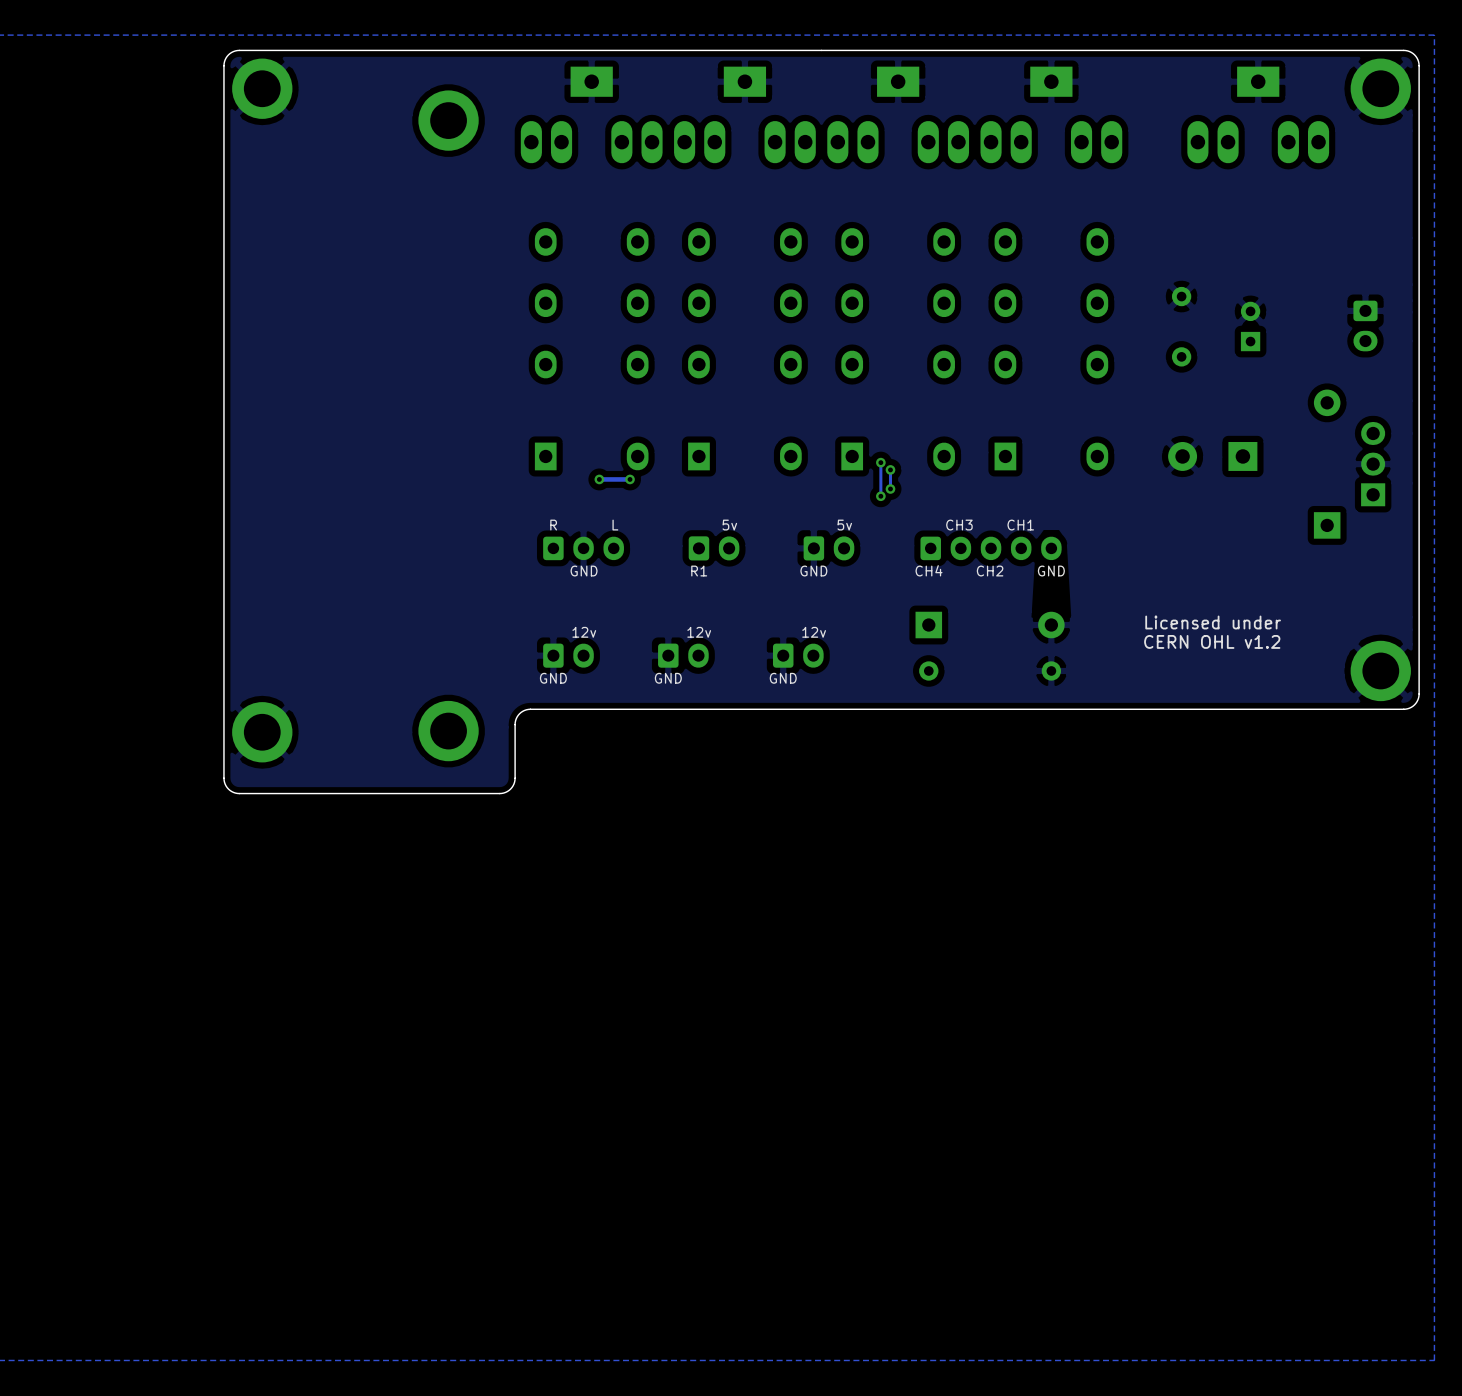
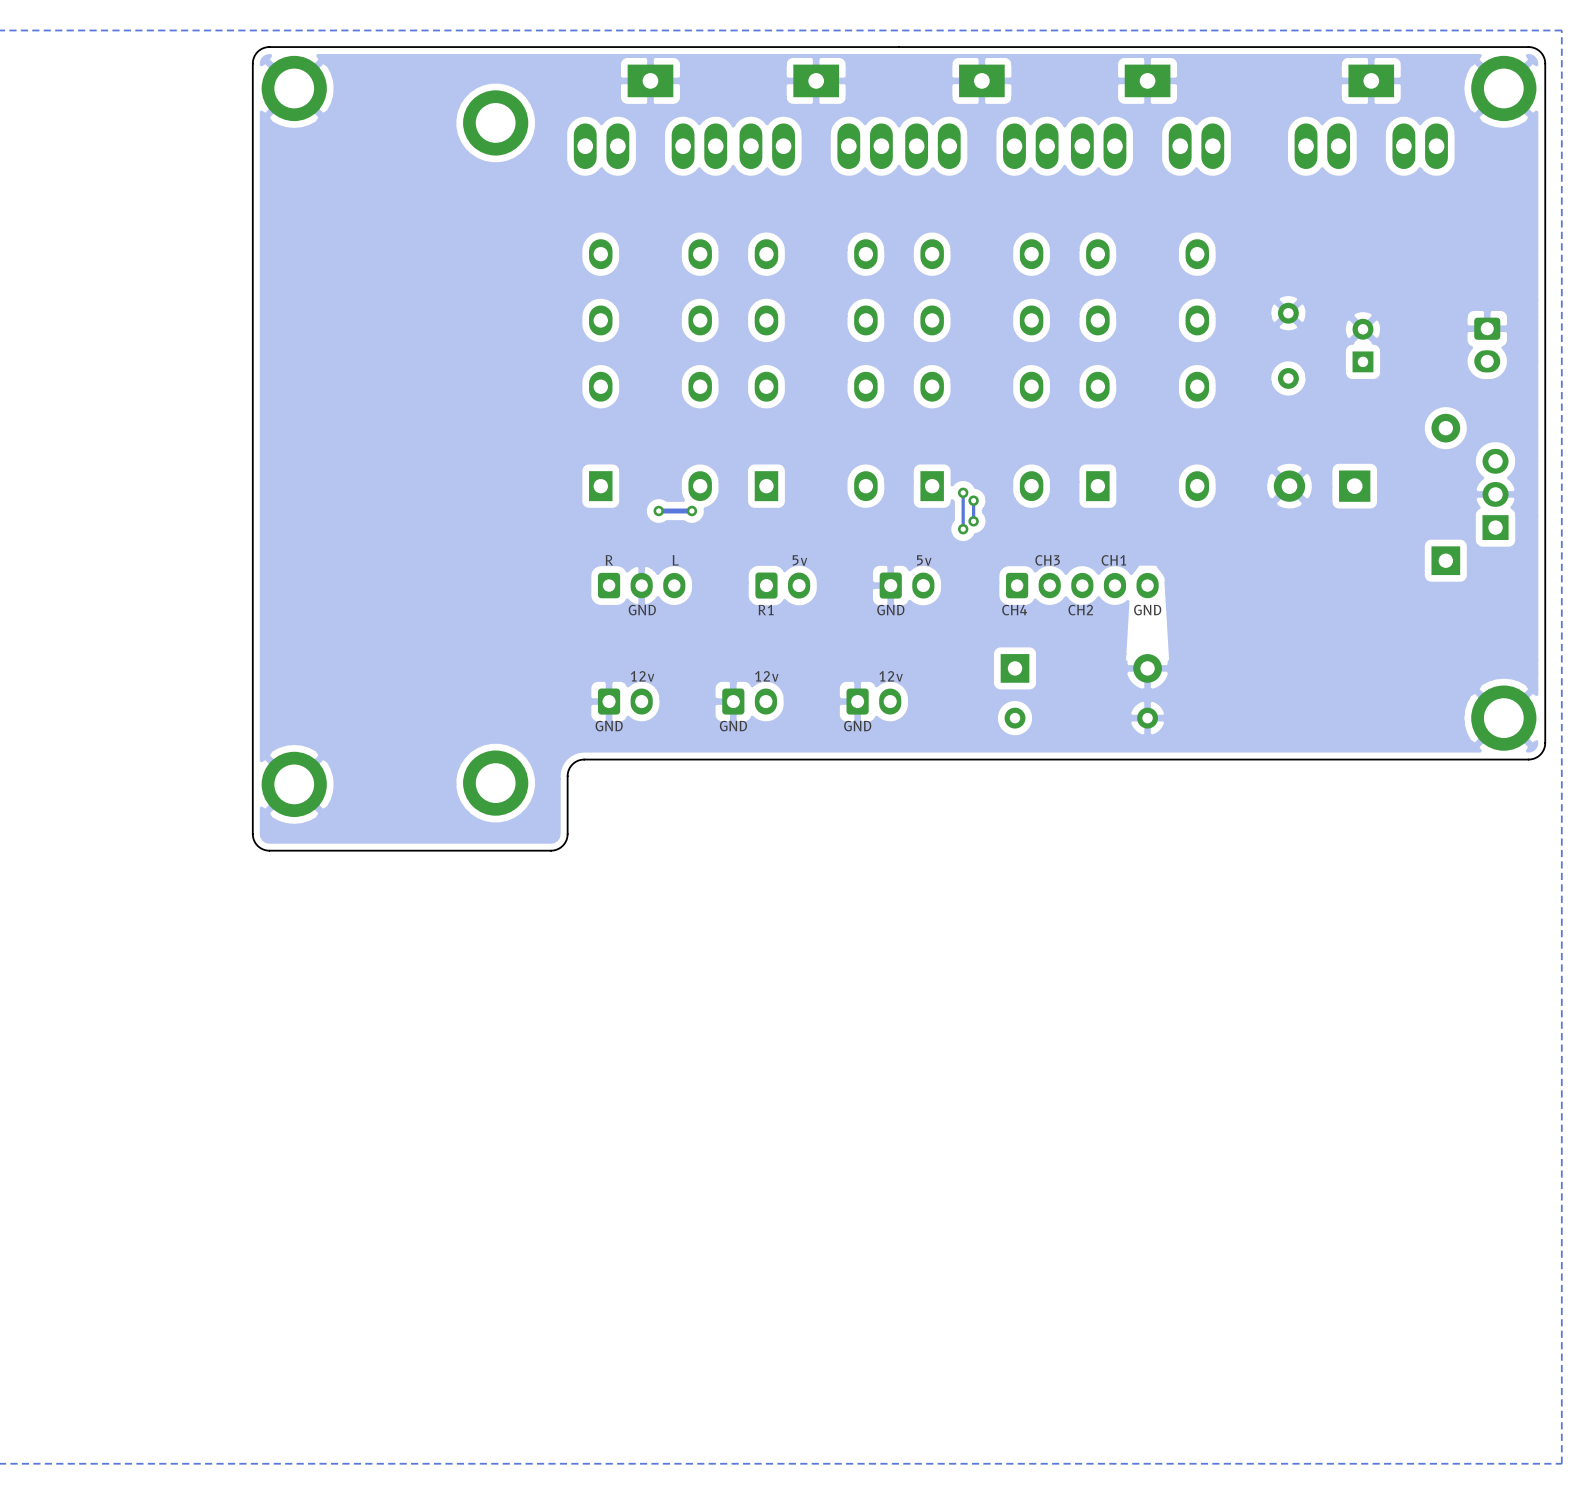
text: Licensed under (1213, 622) -> none
text: CERN OHL v1.2 (1212, 641) -> none

